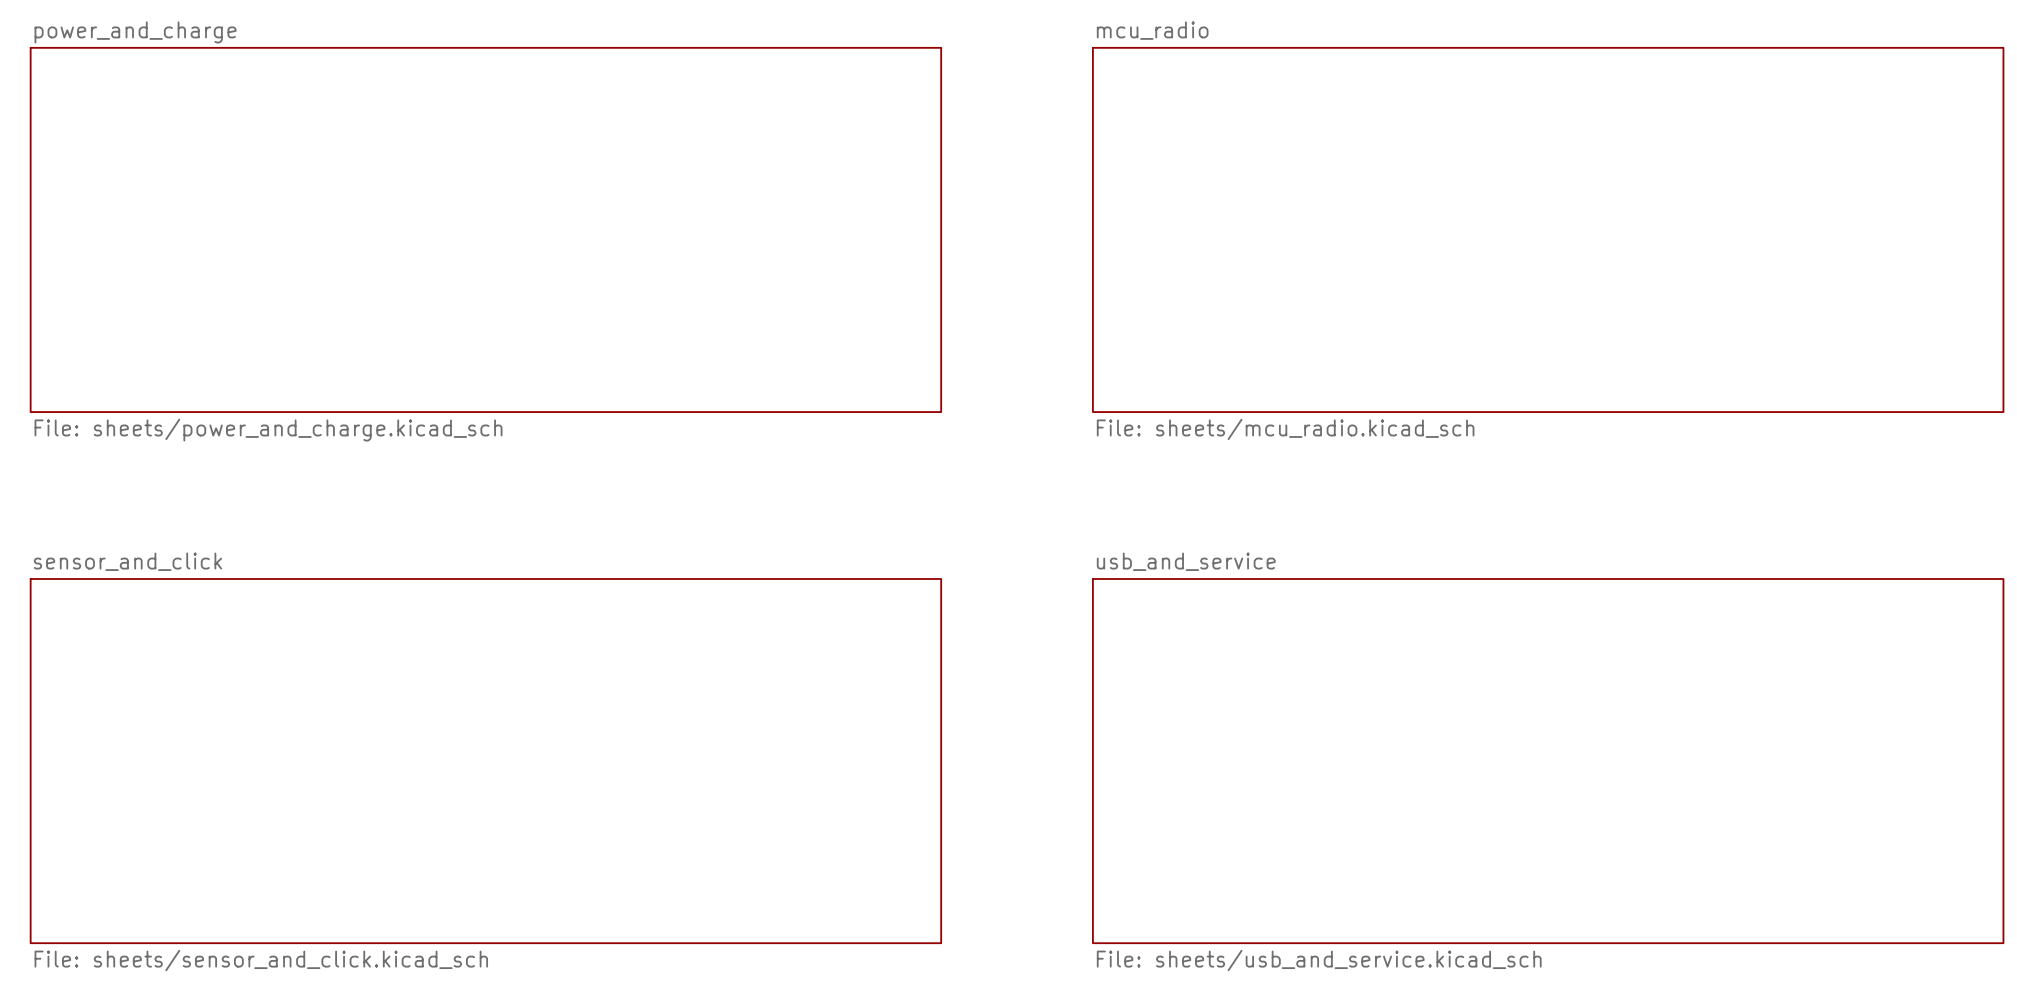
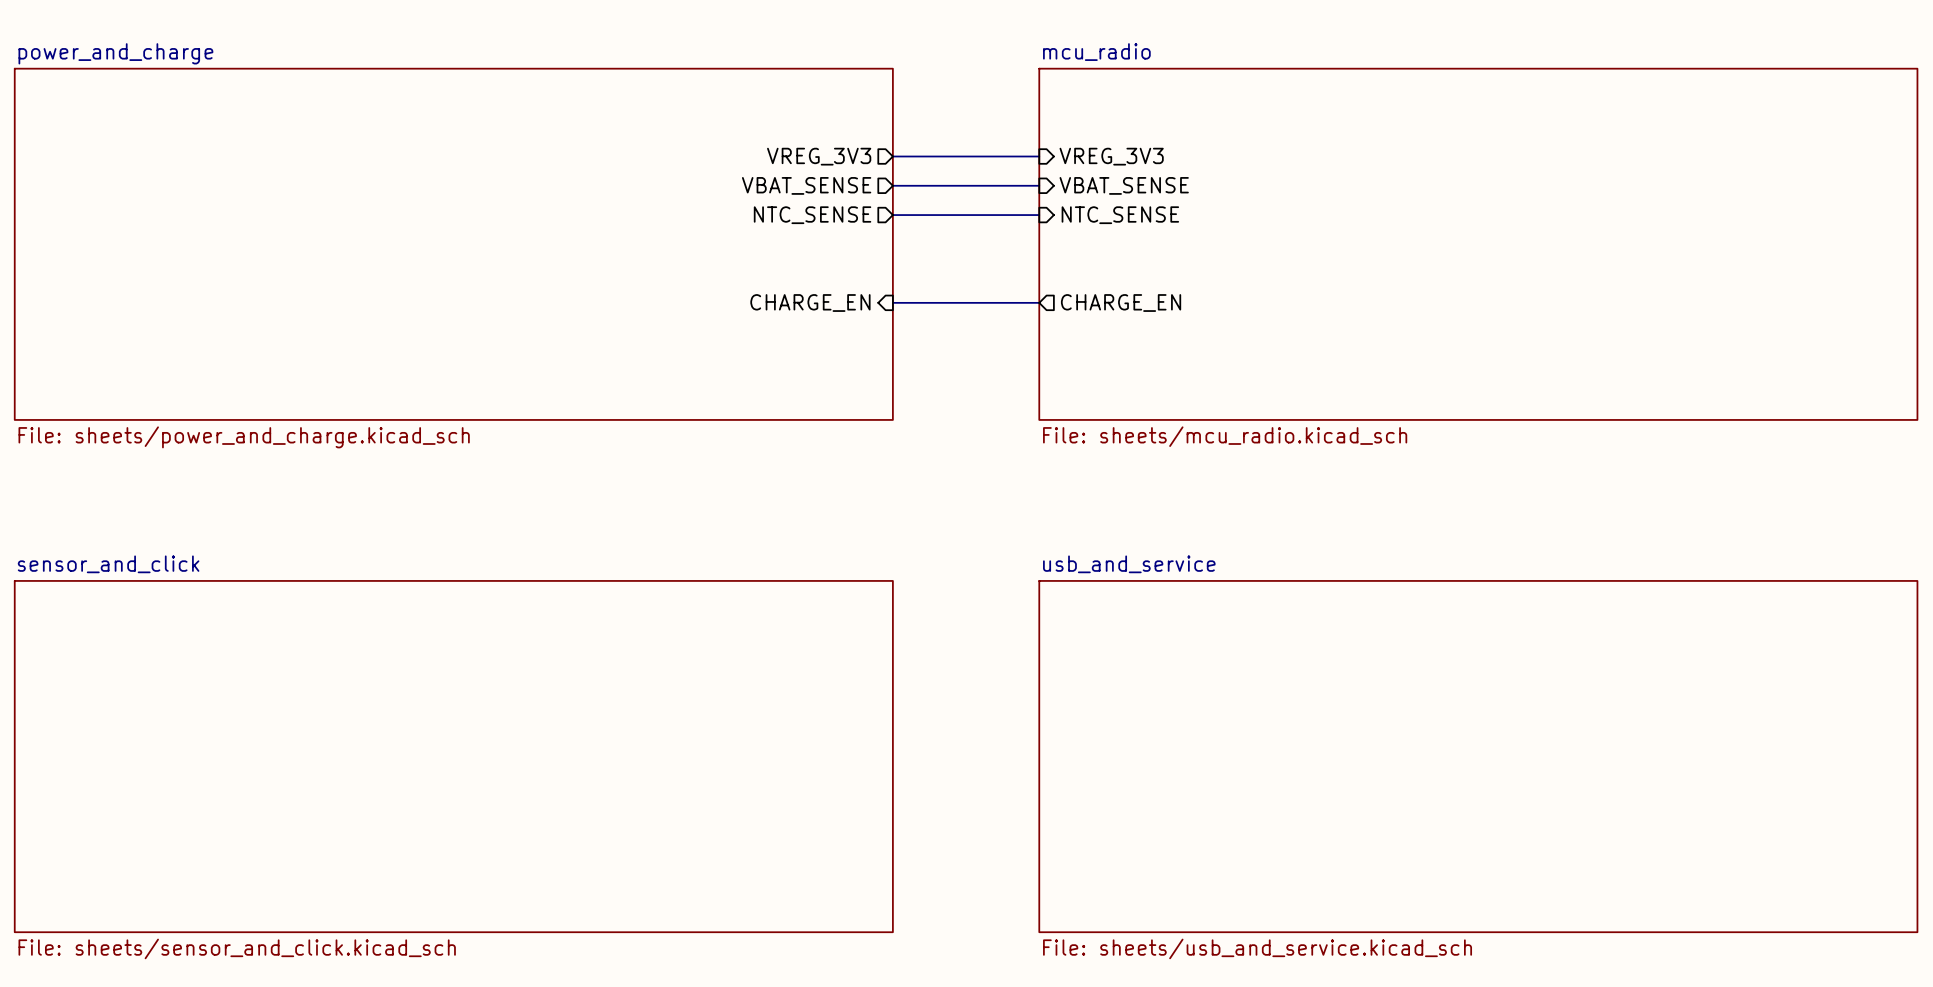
wire: none -> (892, 156) (1039, 156)
sheet pin: none -> VREG_3V3 (819, 156)
sheet pin: none -> VREG_3V3 (1111, 156)
sheet pin: none -> VBAT_SENSE (806, 185)
wire: none -> (892, 185) (1039, 185)
sheet pin: none -> VBAT_SENSE (1124, 185)
sheet pin: none -> NTC_SENSE (812, 215)
wire: none -> (892, 215) (1039, 215)
sheet pin: none -> NTC_SENSE (1120, 215)
sheet pin: none -> CHARGE_EN (810, 303)
wire: none -> (892, 302) (1039, 302)
sheet pin: none -> CHARGE_EN (1121, 303)

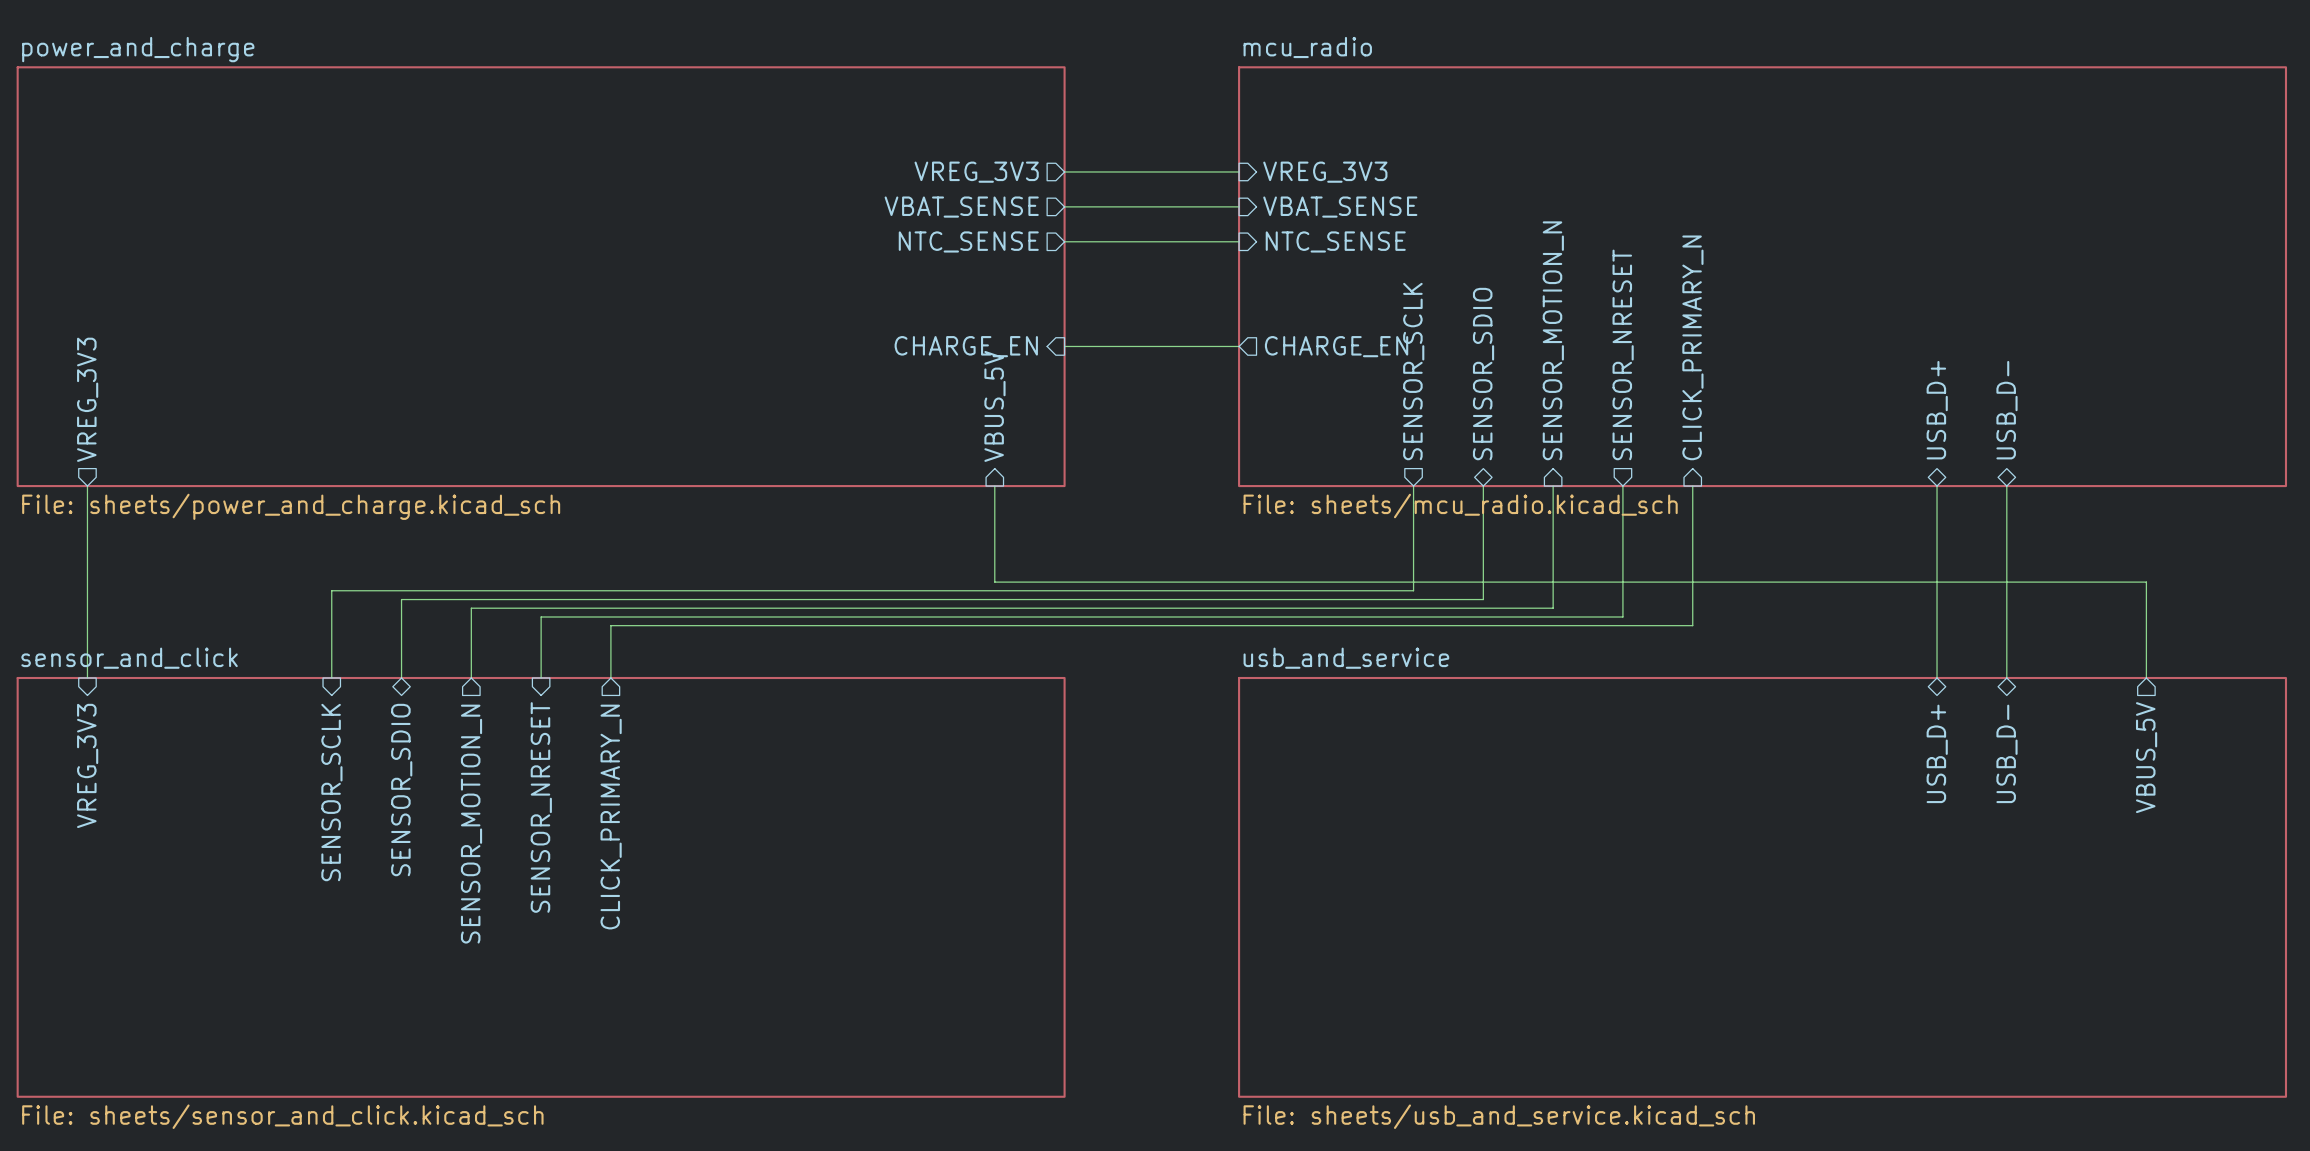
sheet pin: none -> SENSOR_MOTION_N (1553, 340)
sheet pin: none -> CLICK_PRIMARY_N (1692, 347)
sheet pin: none -> SENSOR_NRESET (1623, 354)
sheet pin: none -> SENSOR_SCLK (1413, 371)
sheet pin: none -> SENSOR_SDIO (1483, 374)
sheet pin: none -> VREG_3V3 (87, 399)
sheet pin: none -> VBUS_5V (994, 406)
sheet pin: none -> USB_D+ (1937, 410)
sheet pin: none -> USB_D- (2006, 410)
wire: none -> (87, 486) (87, 677)
wire: none -> (994, 486) (994, 582) (2146, 582) (2146, 677)
wire: none -> (1413, 486) (1413, 590) (331, 590) (331, 677)
wire: none -> (1483, 486) (1483, 599) (401, 599) (401, 677)
wire: none -> (1553, 486) (1553, 608) (471, 608) (471, 677)
wire: none -> (1622, 486) (1622, 616) (541, 616) (541, 677)
wire: none -> (1692, 486) (1692, 625) (610, 625) (610, 677)
wire: none -> (1937, 486) (1937, 677)
wire: none -> (2006, 486) (2006, 677)
sheet pin: none -> USB_D+ (1937, 753)
sheet pin: none -> USB_D- (2006, 753)
sheet pin: none -> VBUS_5V (2146, 757)
sheet pin: none -> VREG_3V3 (87, 765)
sheet pin: none -> SENSOR_SDIO (401, 790)
sheet pin: none -> SENSOR_SCLK (331, 792)
sheet pin: none -> SENSOR_NRESET (541, 807)
sheet pin: none -> CLICK_PRIMARY_N (611, 817)
sheet pin: none -> SENSOR_MOTION_N (471, 824)

